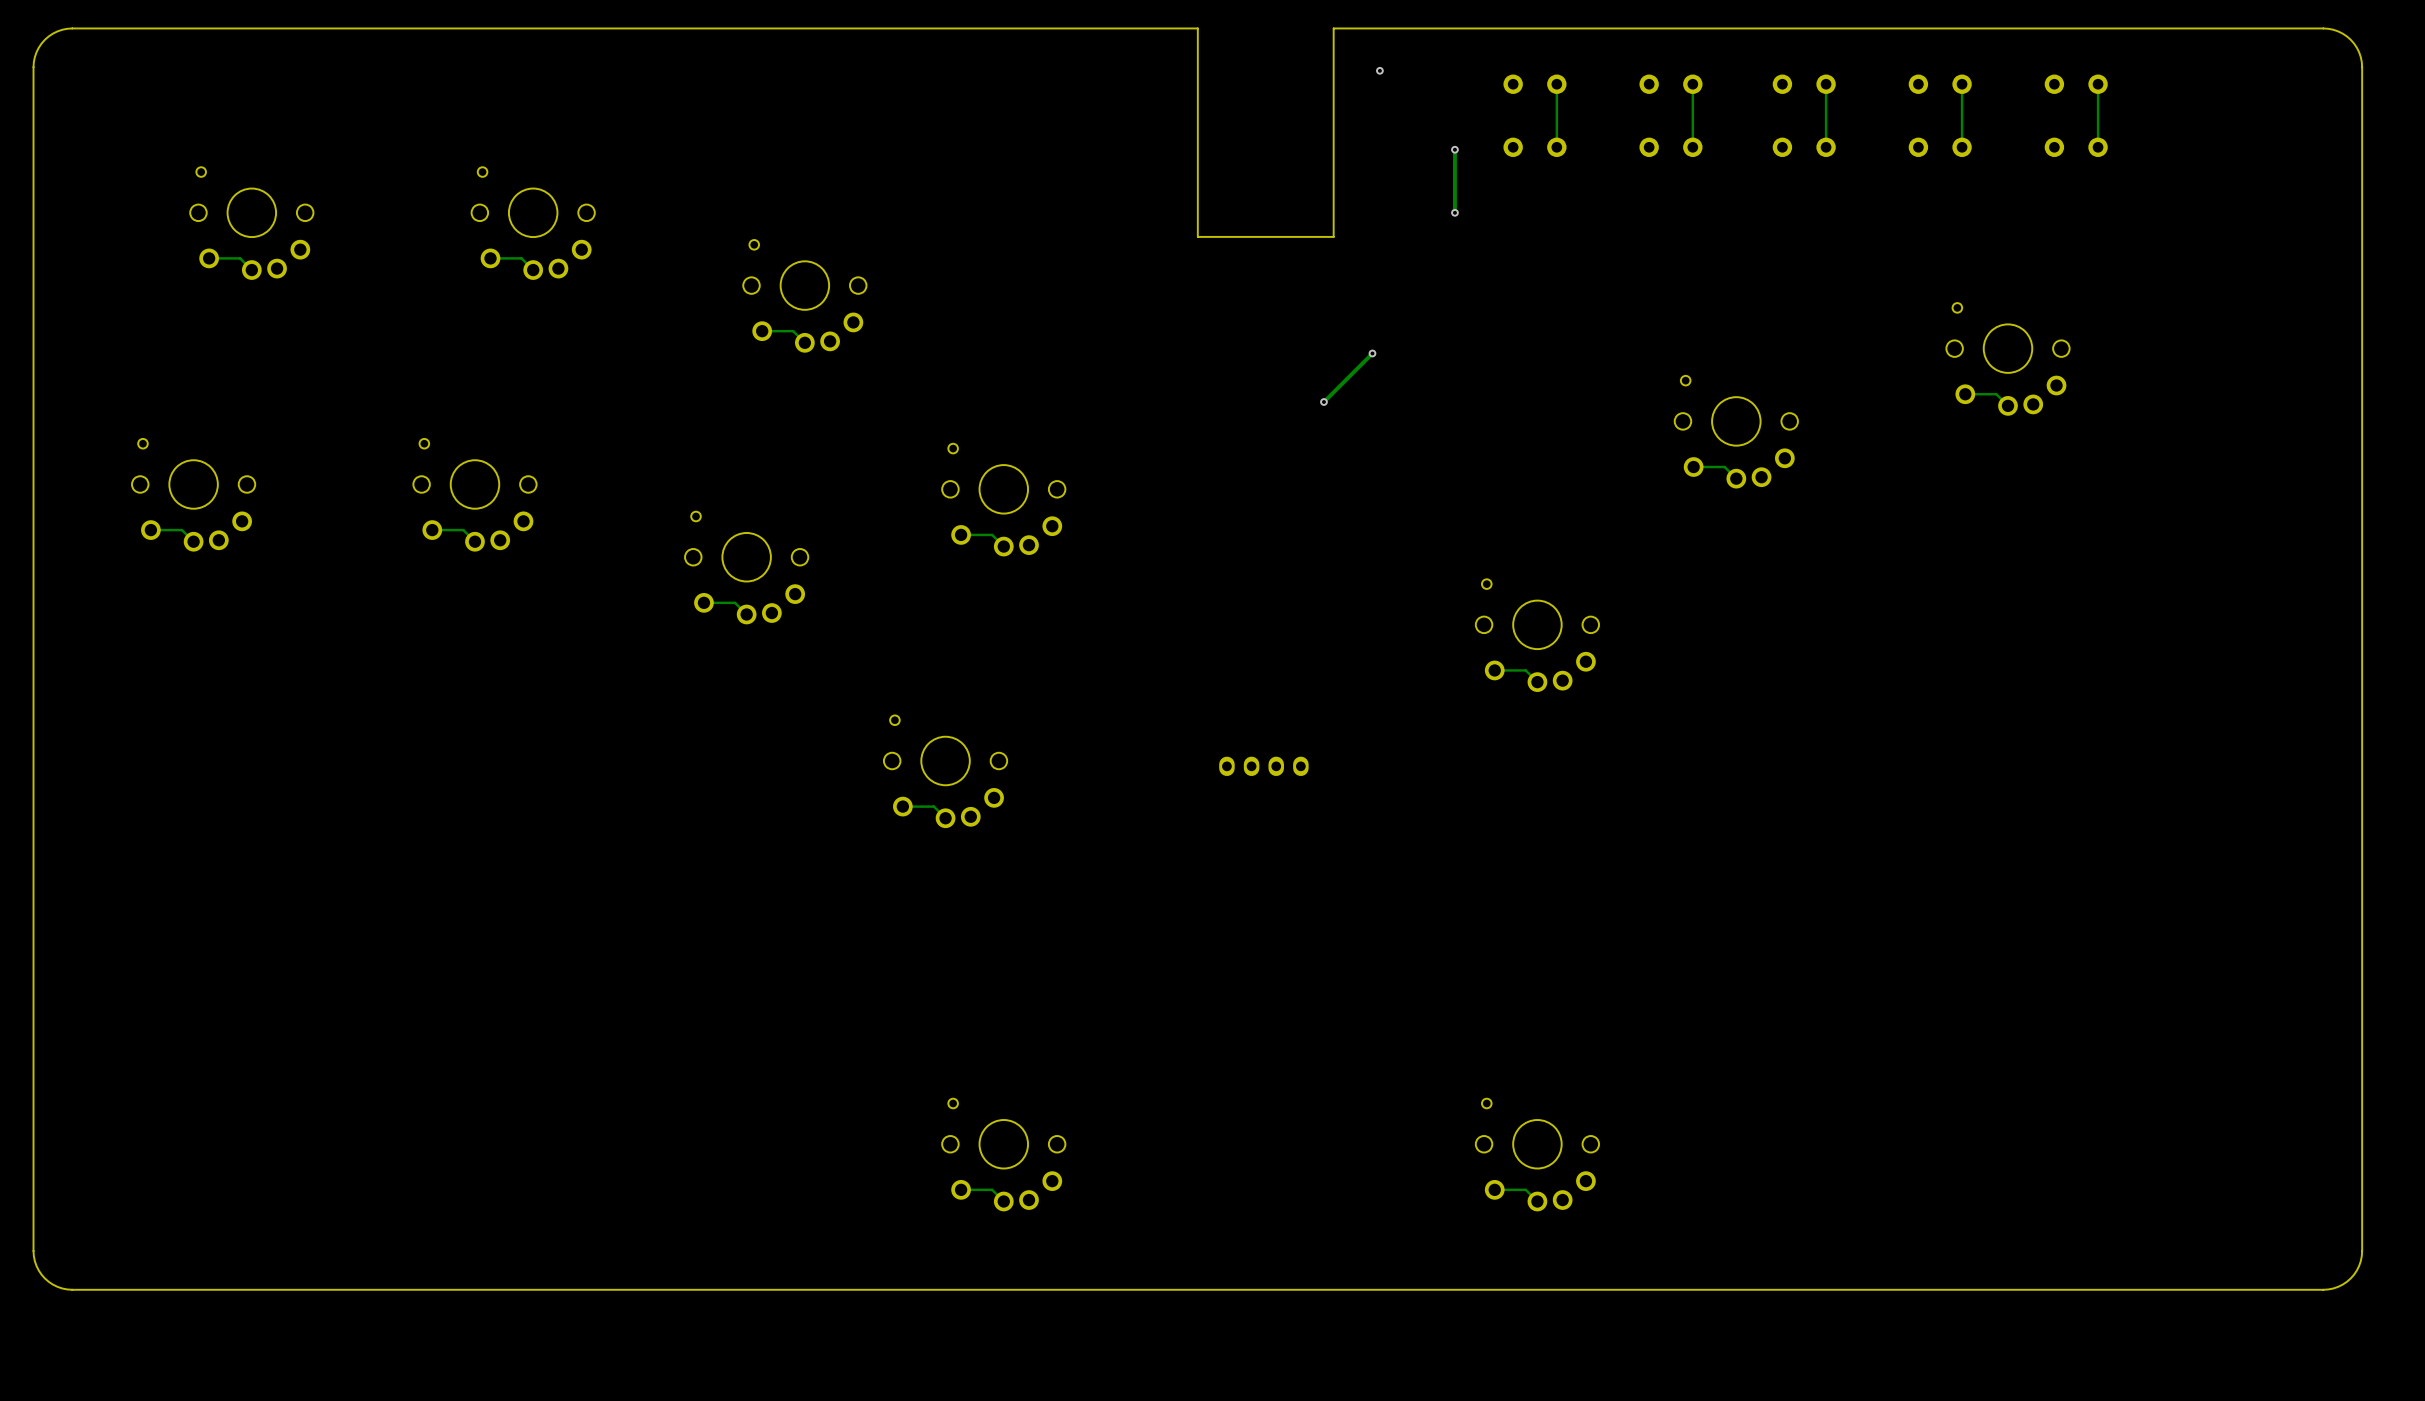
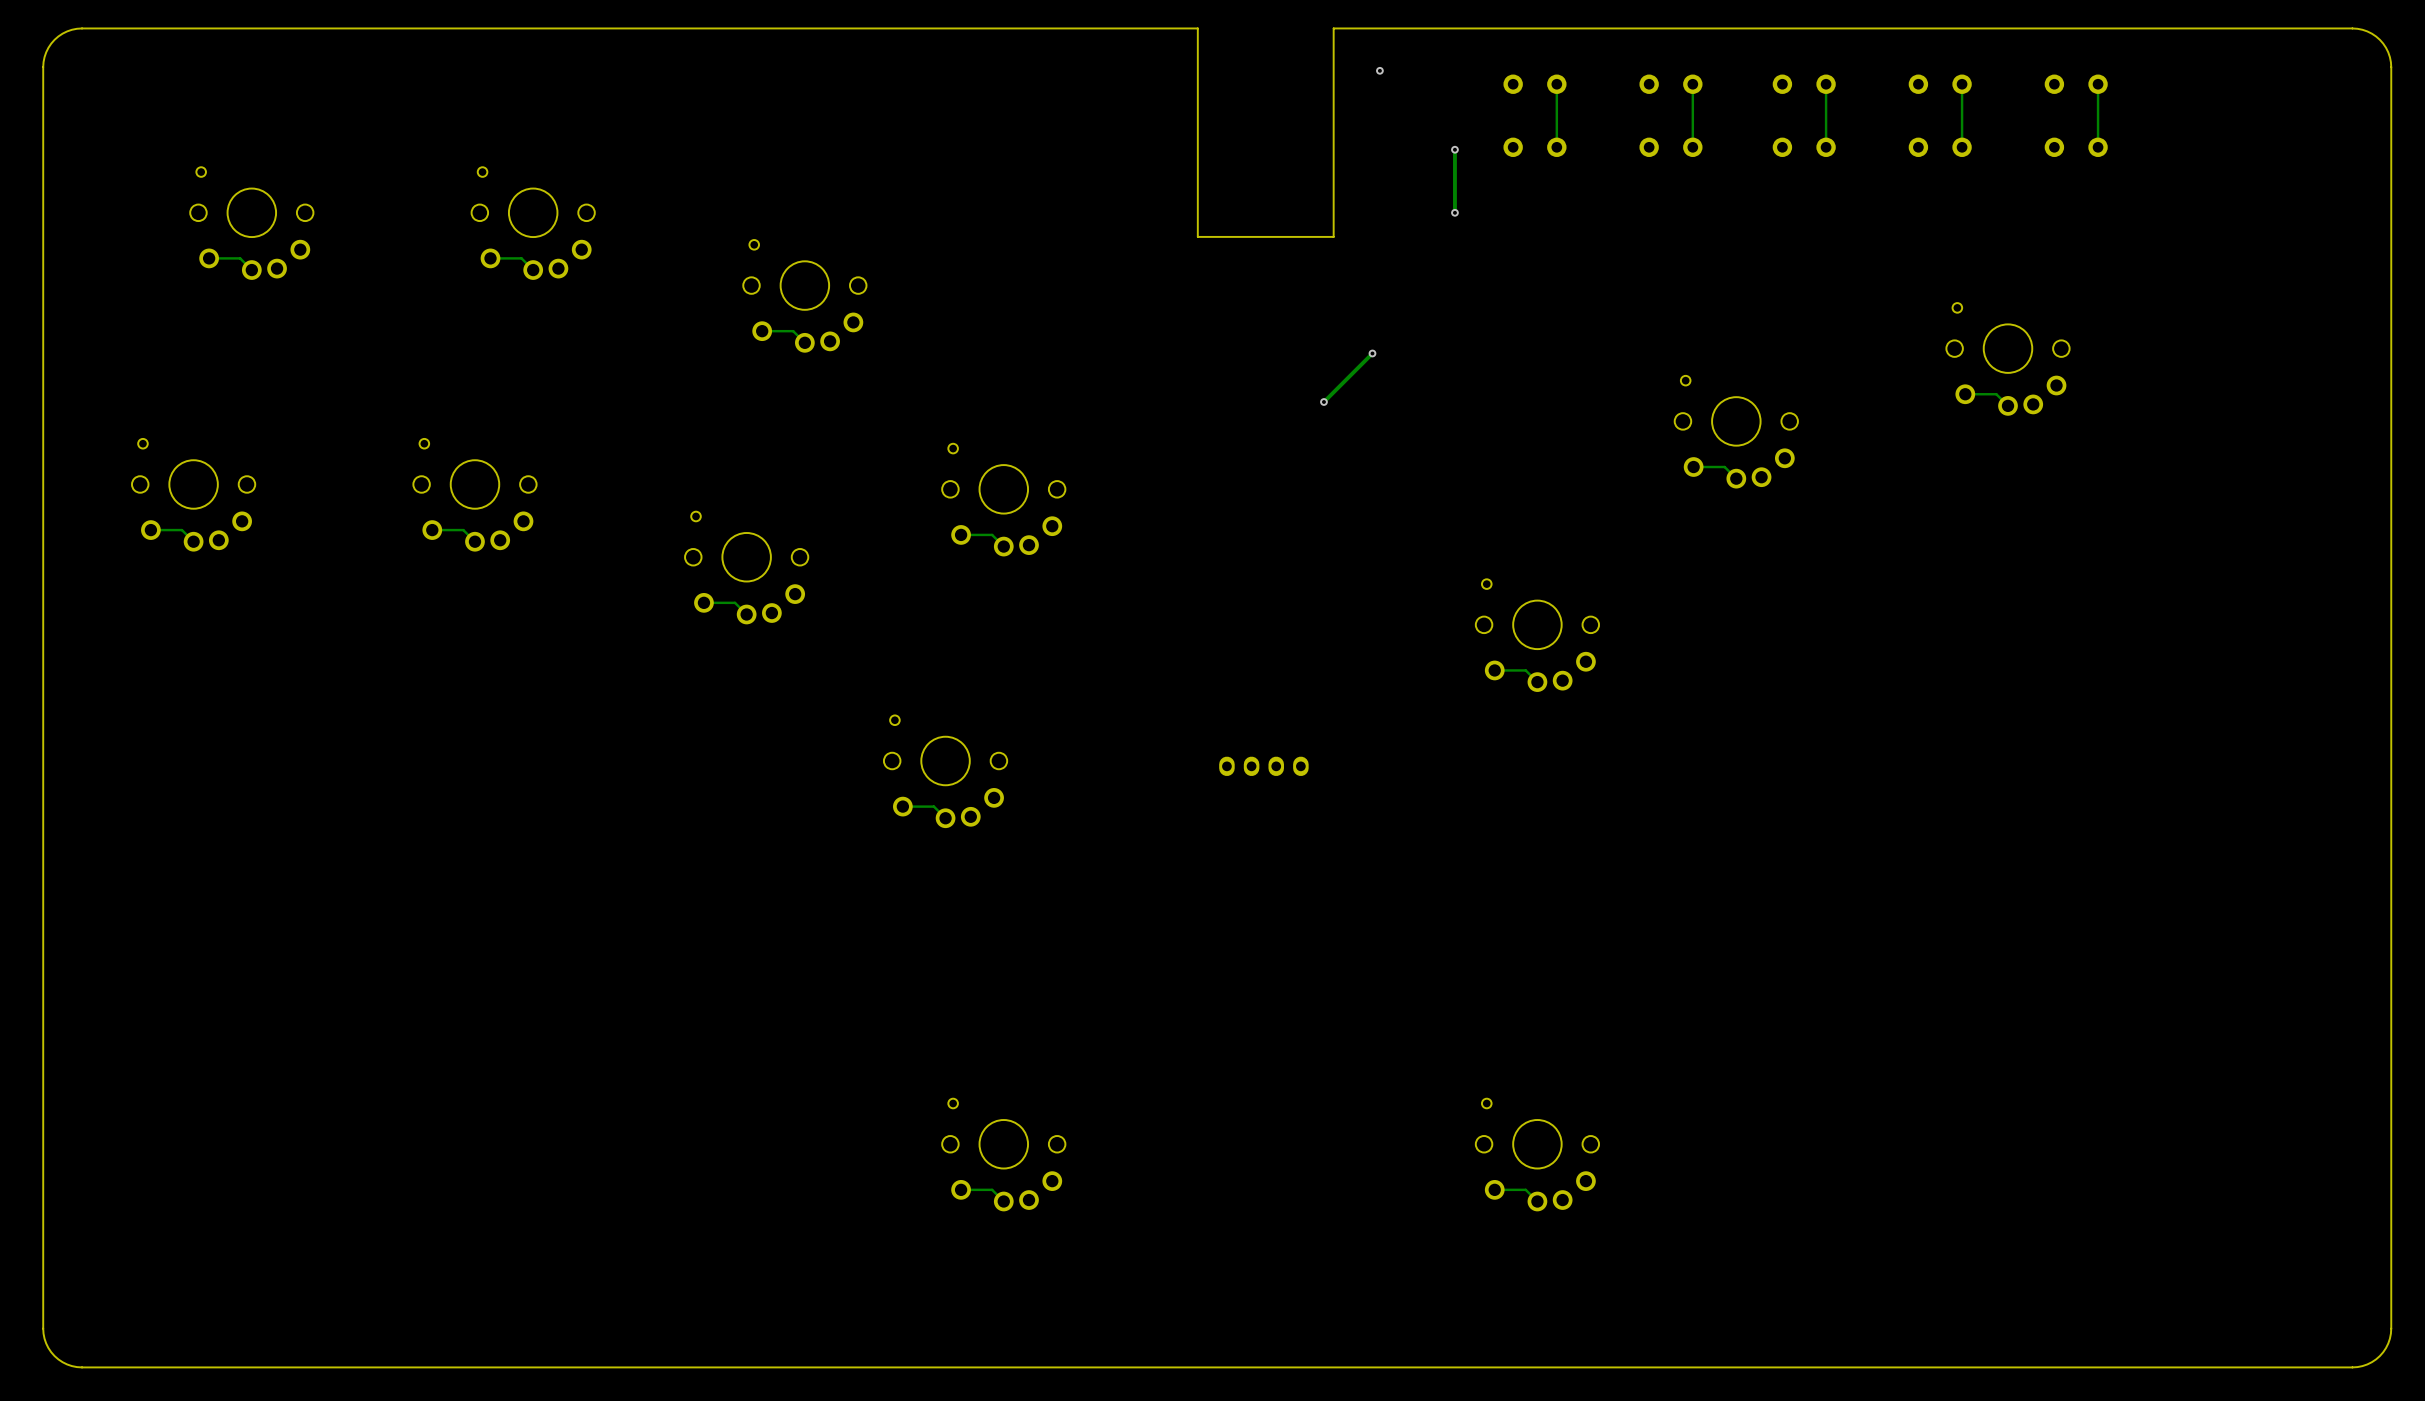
board edge: (2323, 28) (2338, 31) (2350, 39) (2359, 52) (2362, 67) (2362, 1250) (2356, 1270) (2342, 1284) (2323, 1289) (72, 1289) (57, 1286) (44, 1278) (36, 1265) (33, 1250) (33, 67) (38, 47) (48, 36) (62, 29) (82, 28) -> (2323, 28) (2357, 28) (2371, 33) (2386, 47) (2391, 67) (2391, 1328) (2388, 1343) (2379, 1356) (2367, 1364) (2352, 1367) (82, 1367) (62, 1362) (48, 1348) (43, 1328) (43, 67) (46, 52) (54, 39) (67, 31) (82, 28)

